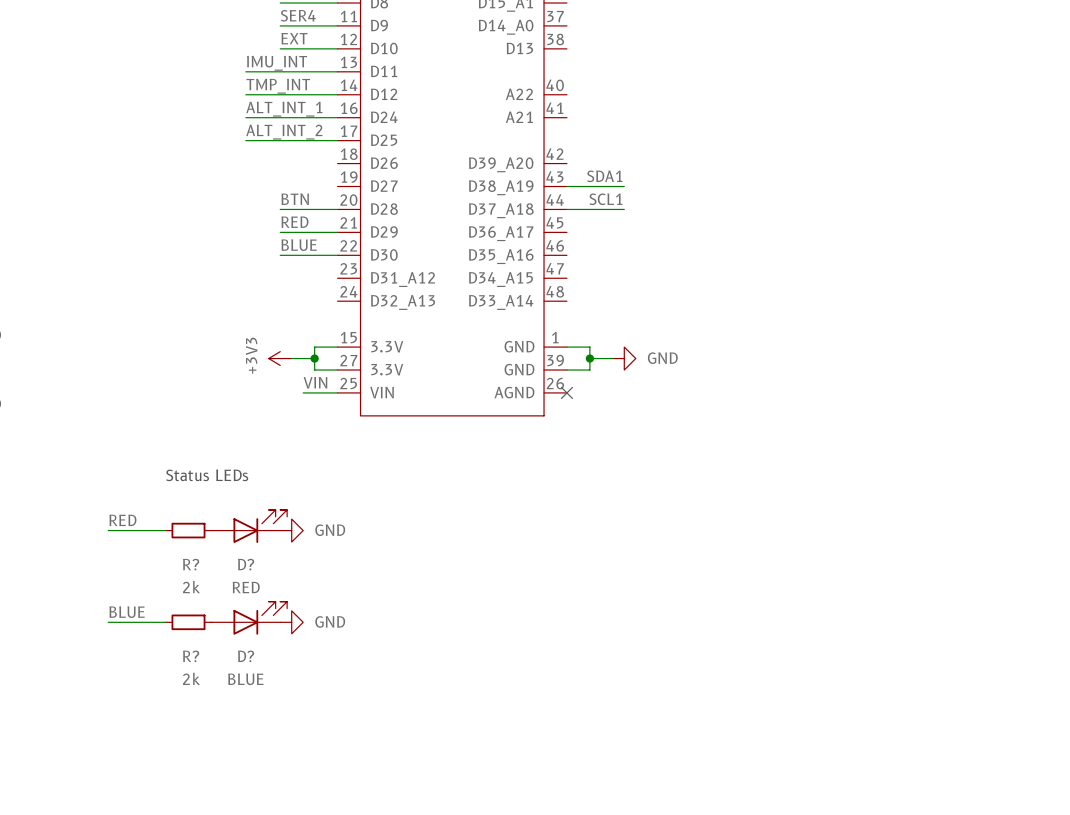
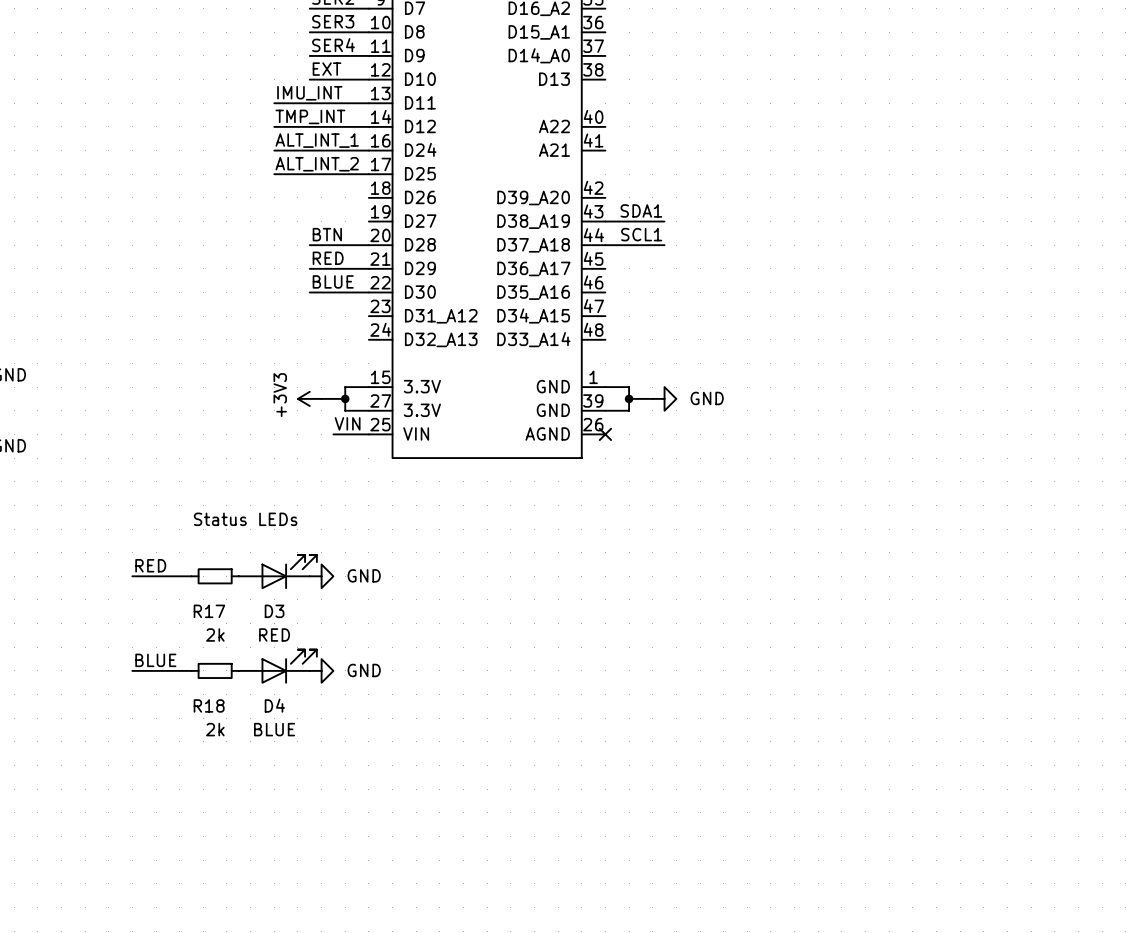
R? name: R? (191, 564) -> R17 (209, 611)
D? name: D? (246, 564) -> D3 (274, 611)
R? name: R? (191, 656) -> R18 (209, 705)
D? name: D? (246, 656) -> D4 (274, 705)

